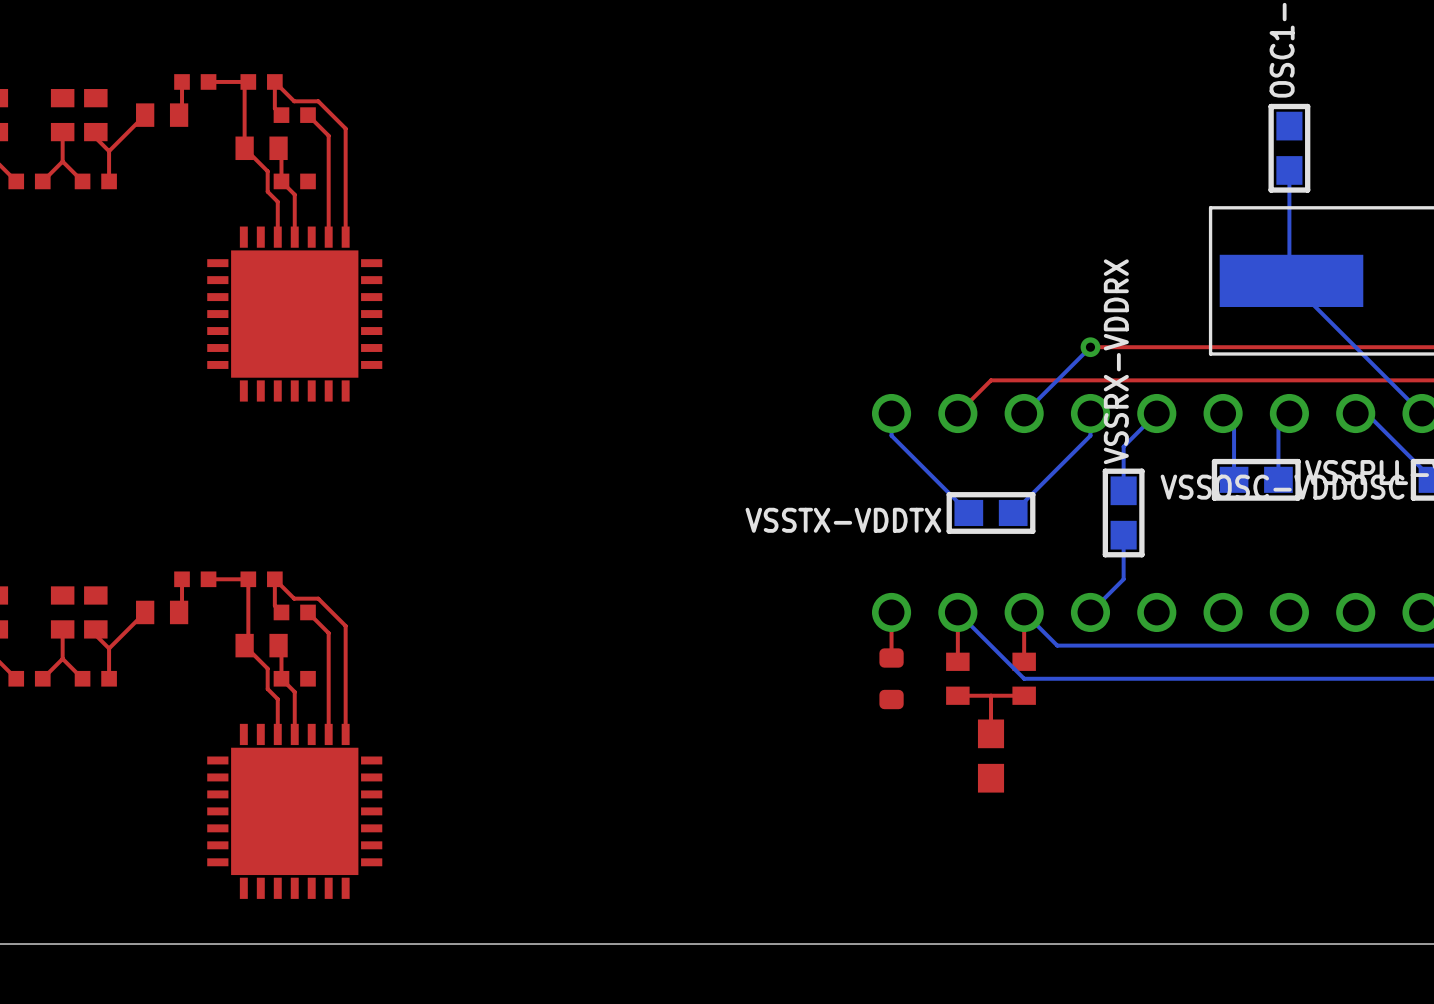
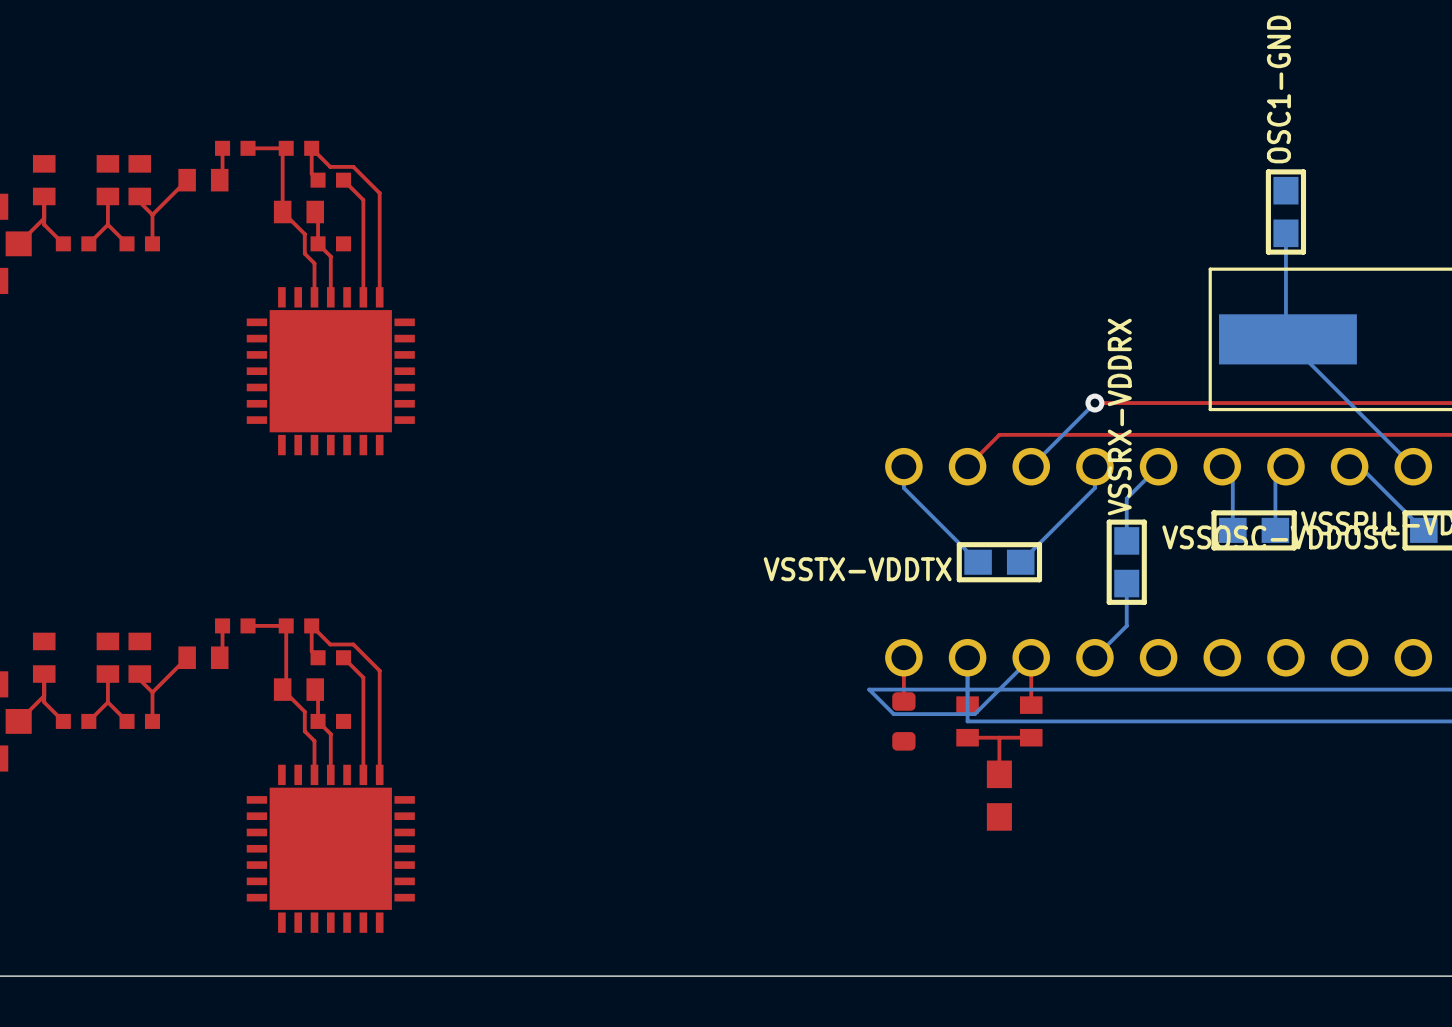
bottom track: (957, 612) (1024, 678) -> (967, 657) (967, 721) (1031, 721)
bottom track: (1024, 612) (1057, 645) -> (1031, 657) (974, 714) (893, 714) (869, 689) (1063, 689)

